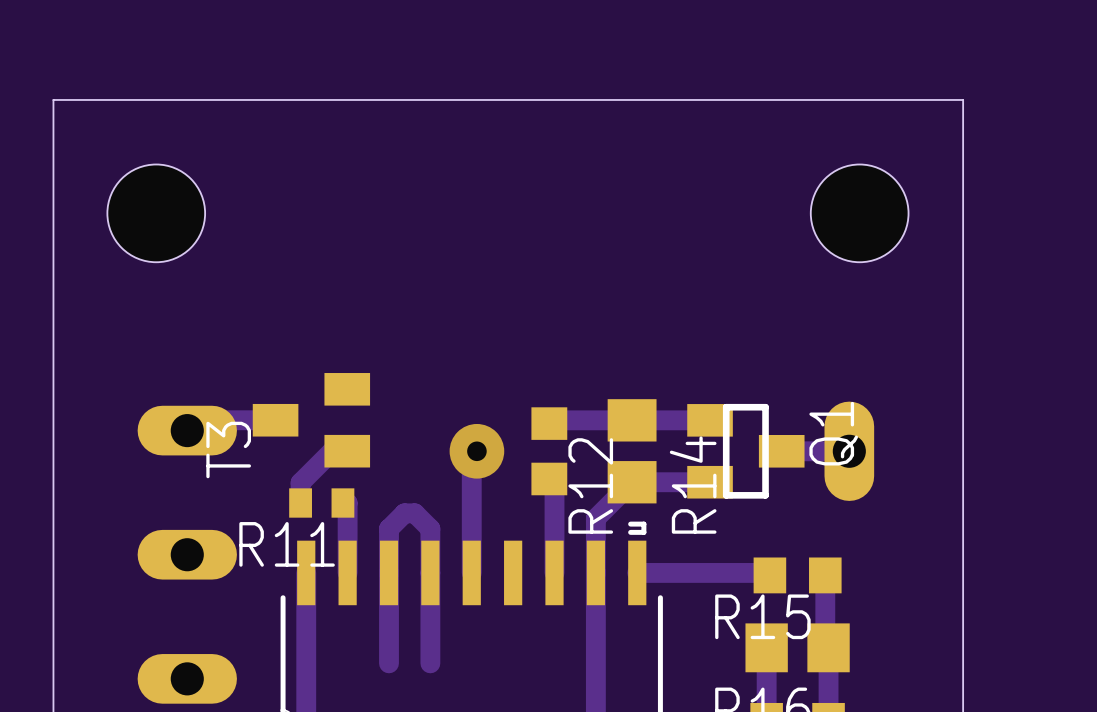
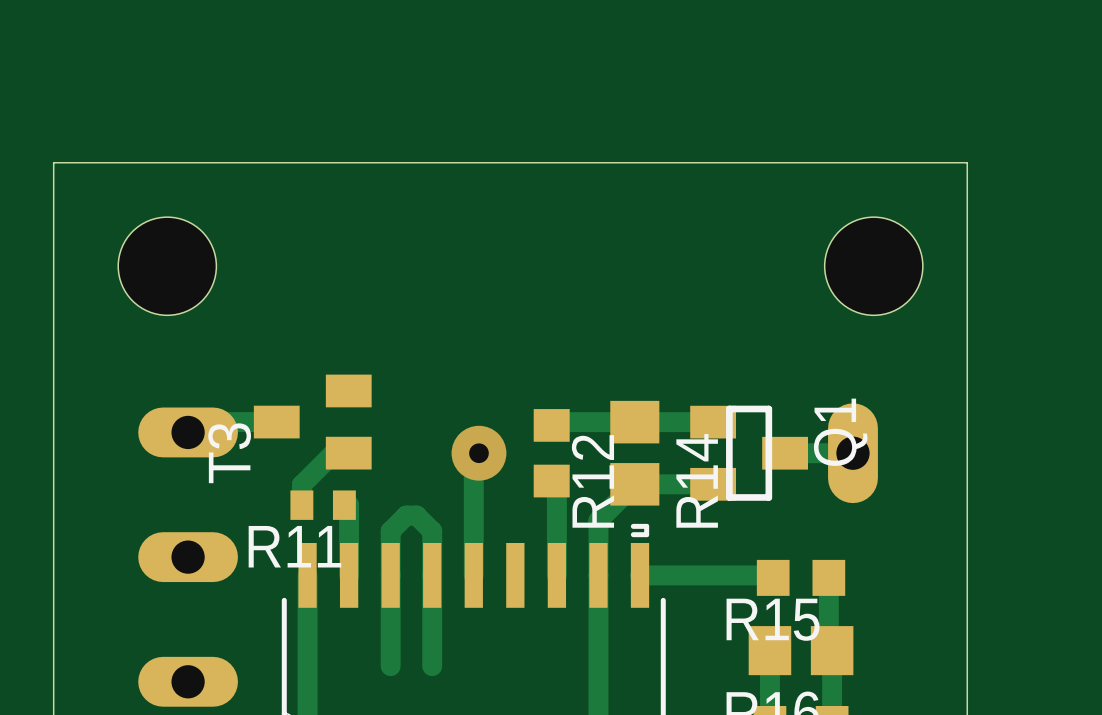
board edge: (963, 162) (963, 99) (53, 99) (53, 162) -> (967, 162) (53, 162)
hole position: (156, 213) -> (167, 266)
hole position: (859, 213) -> (873, 266)

